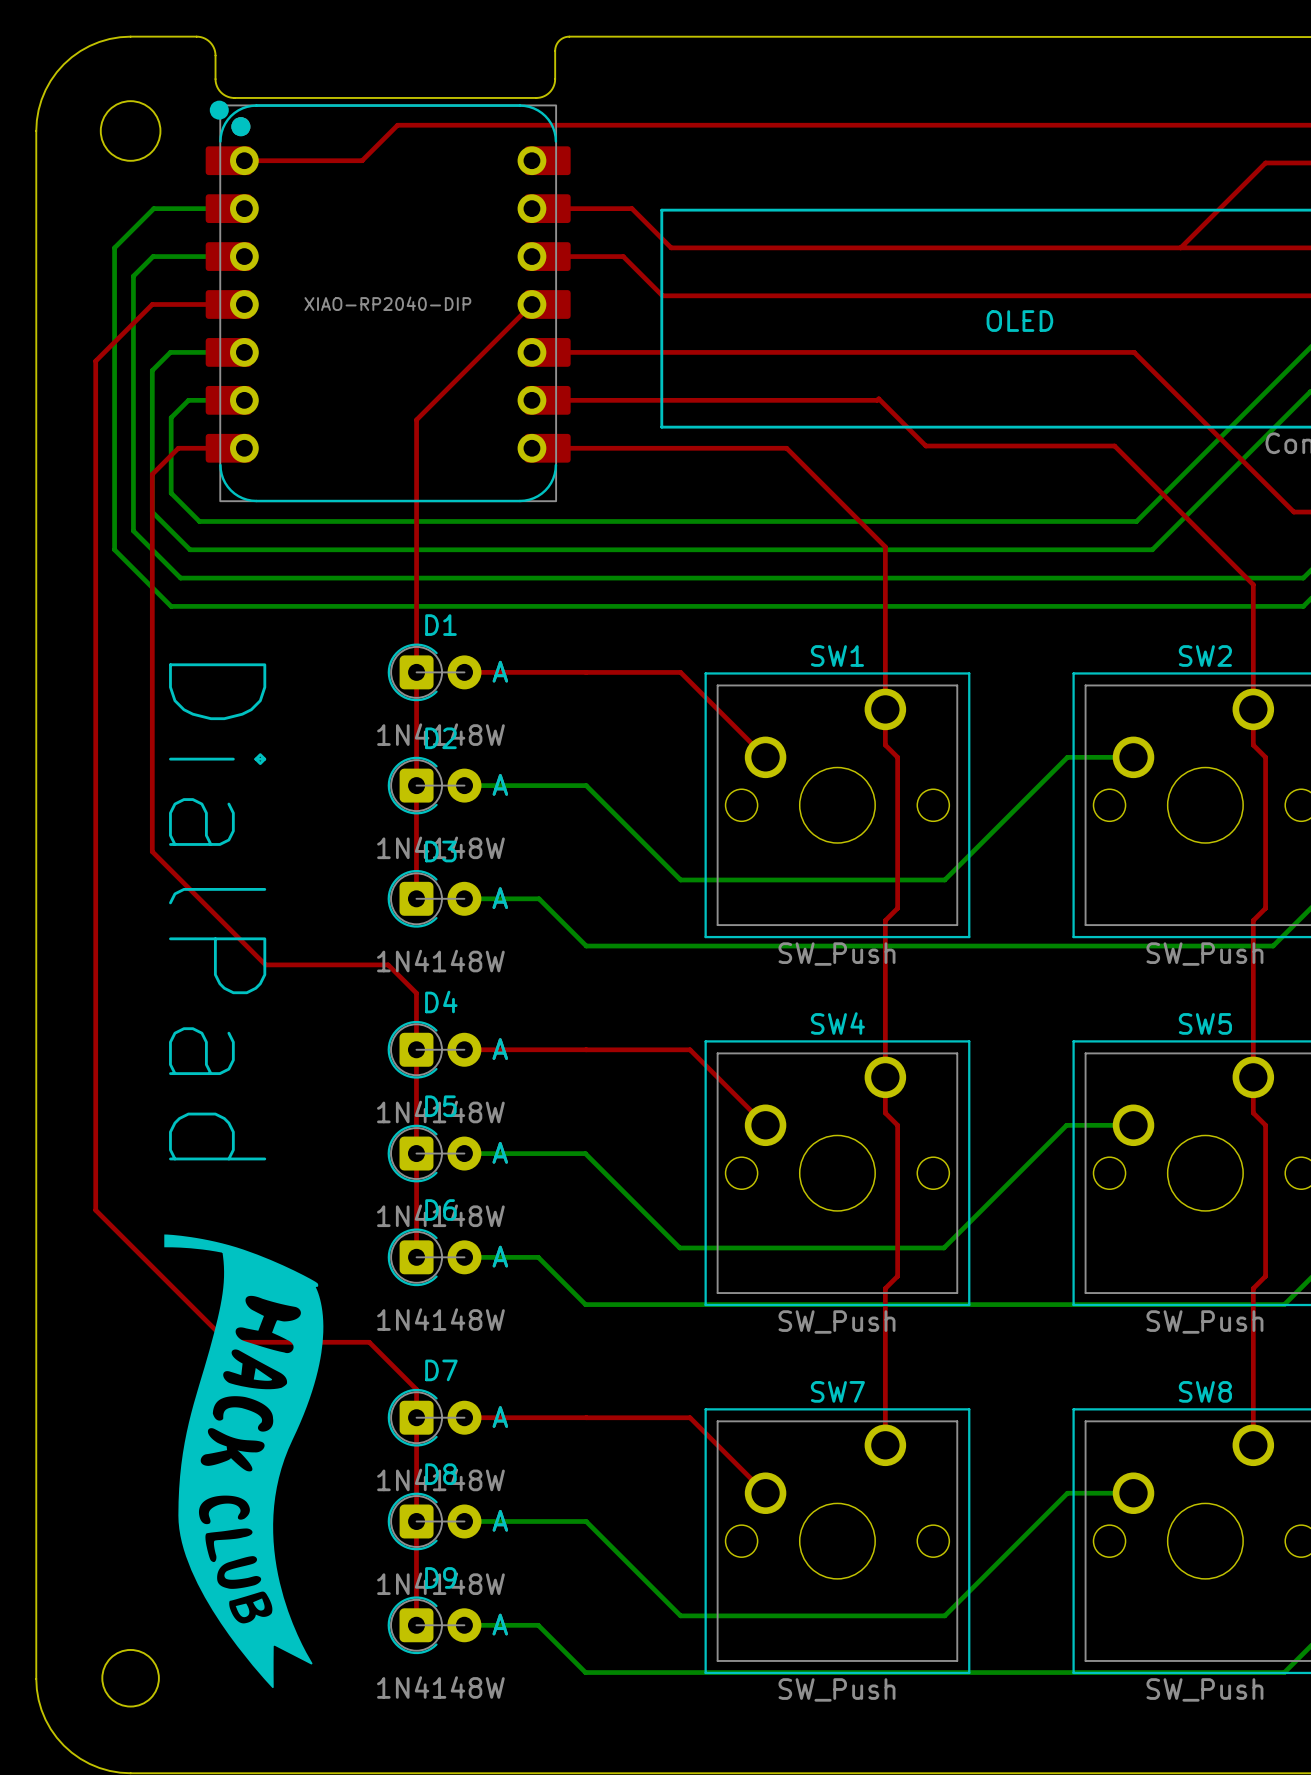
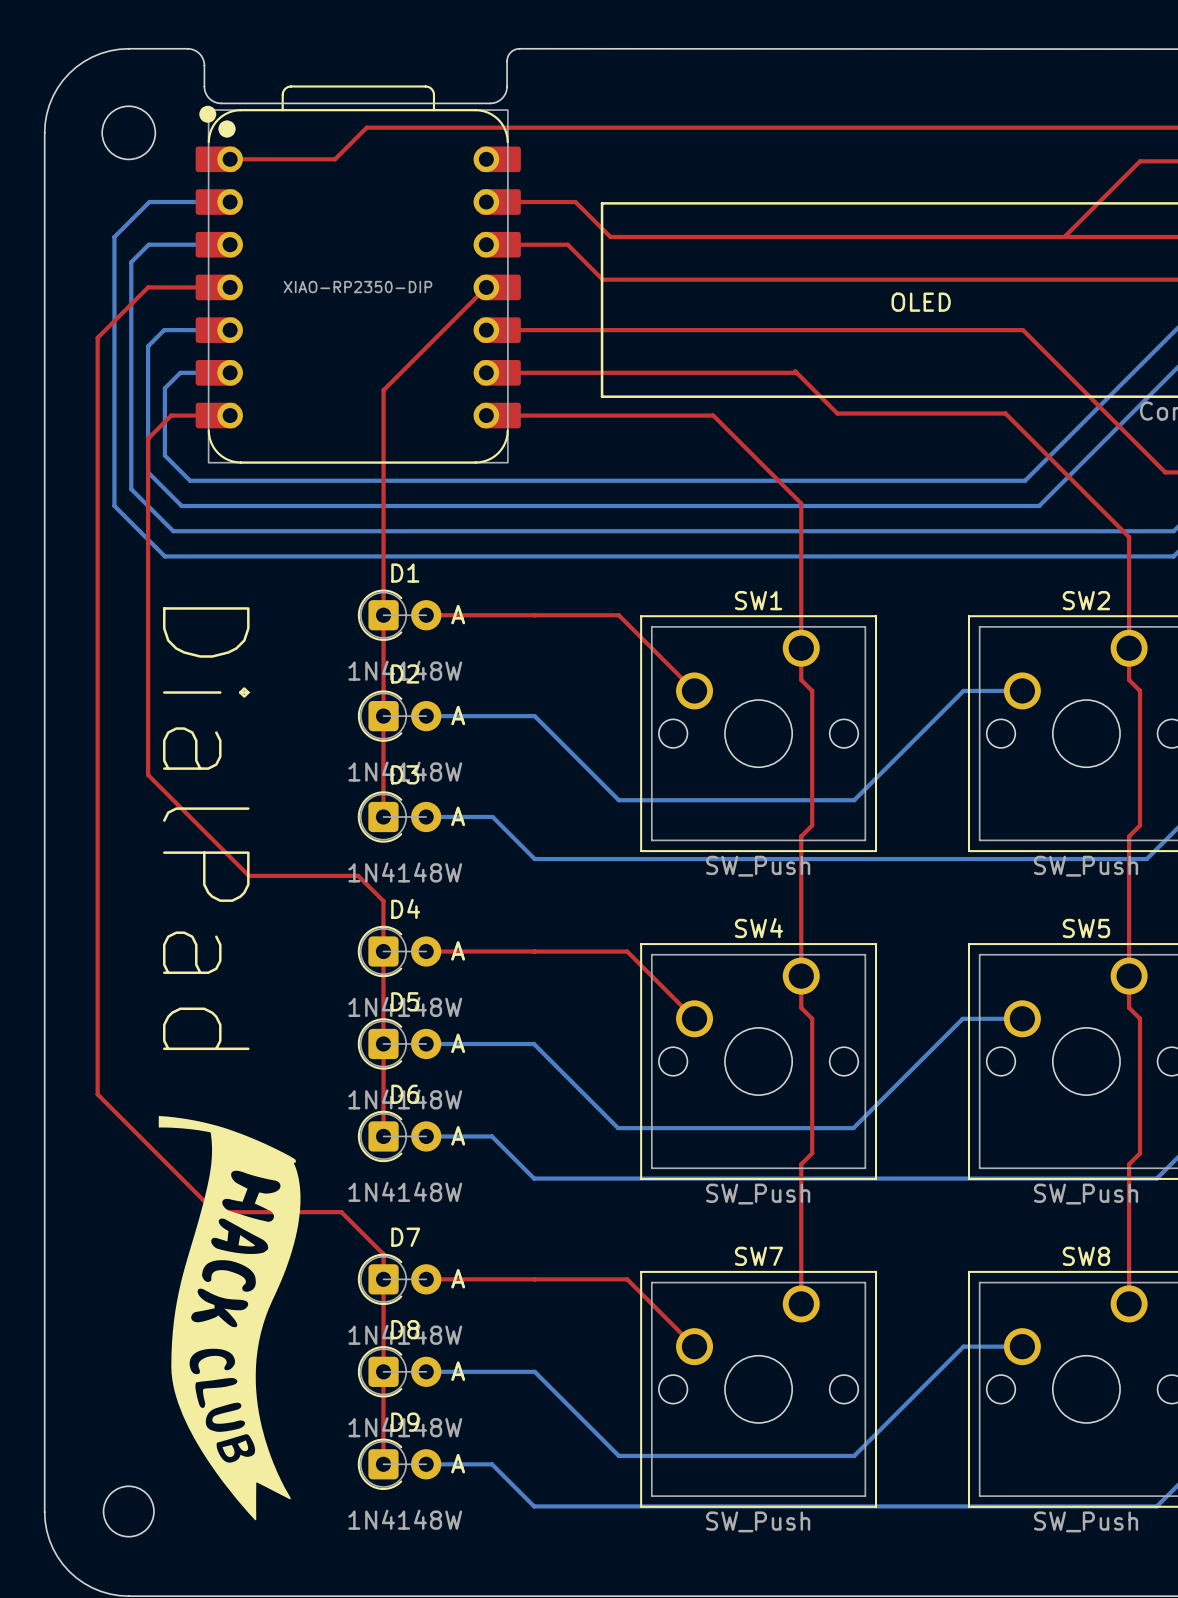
part footprint: [205, 100, 571, 503] -> [195, 85, 521, 464]
part value: XIAO-RP2040-DIP (387, 303) -> XIAO-RP2350-DIP (358, 287)

